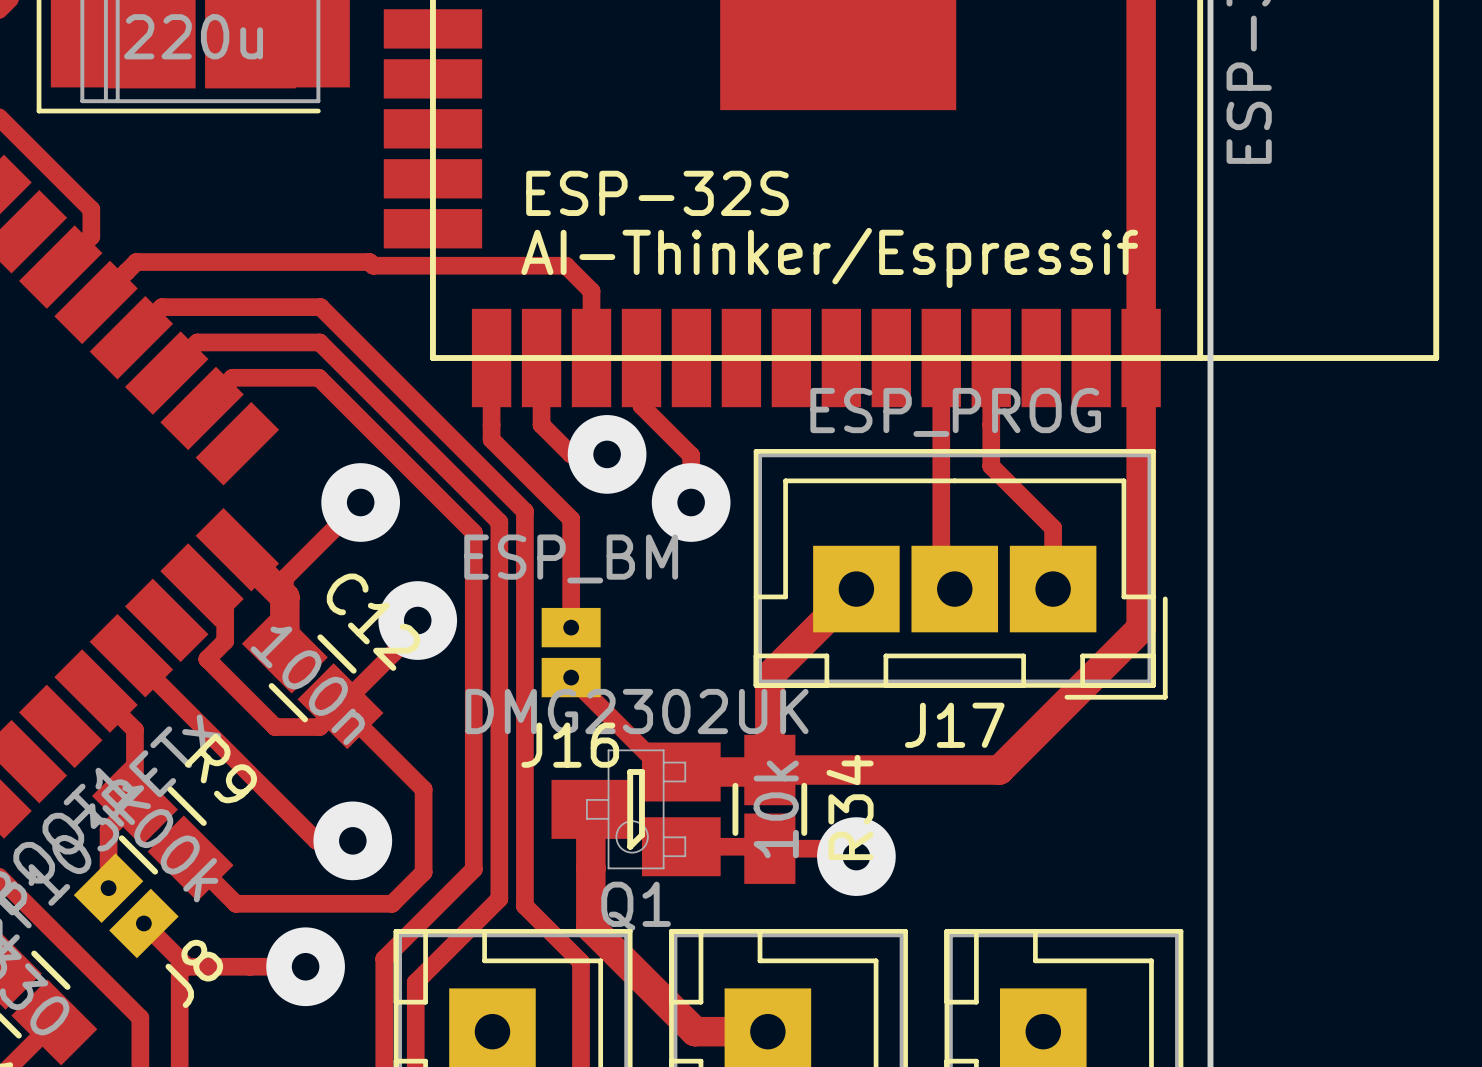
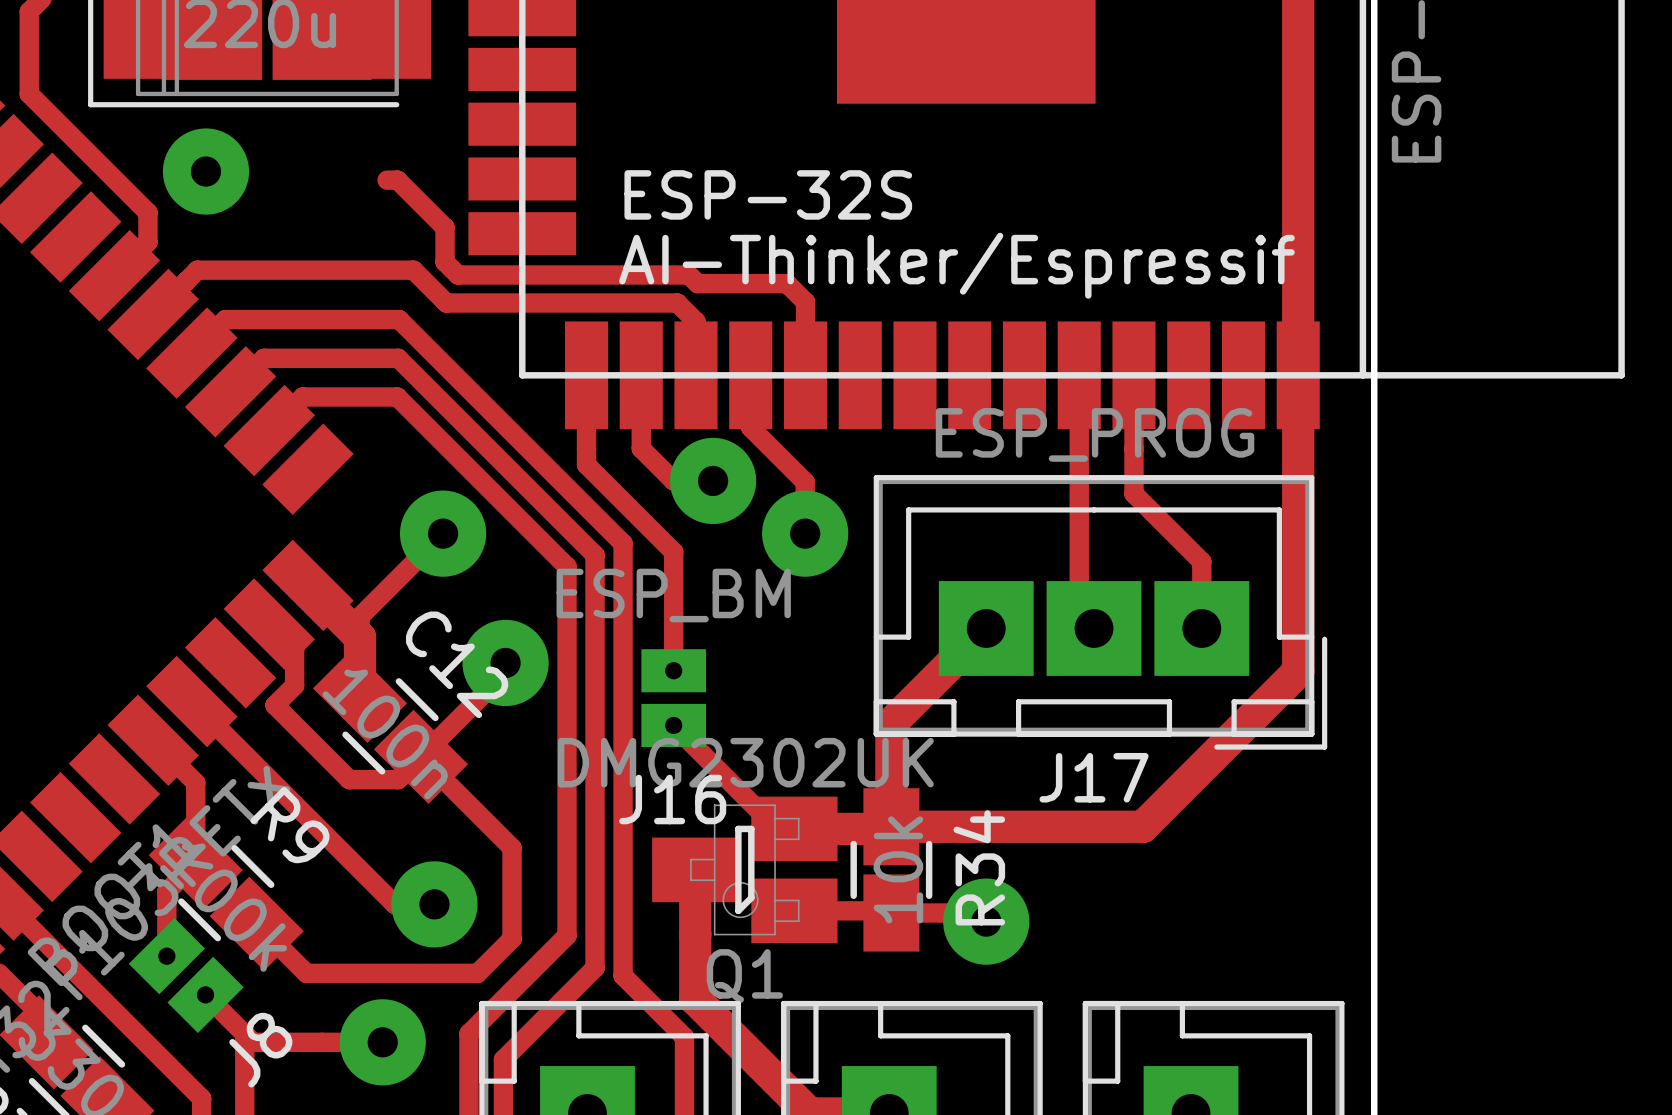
via: none -> (205, 171)
track: none -> (387, 180) (397, 180) (445, 227) (445, 262) (457, 274) (688, 274) (697, 283) (787, 283) (805, 302) (805, 375)
track: (333, 262) (369, 262) (373, 265) (566, 265) (591, 291) (591, 309) -> (413, 270) (446, 303) (677, 303) (696, 321)

